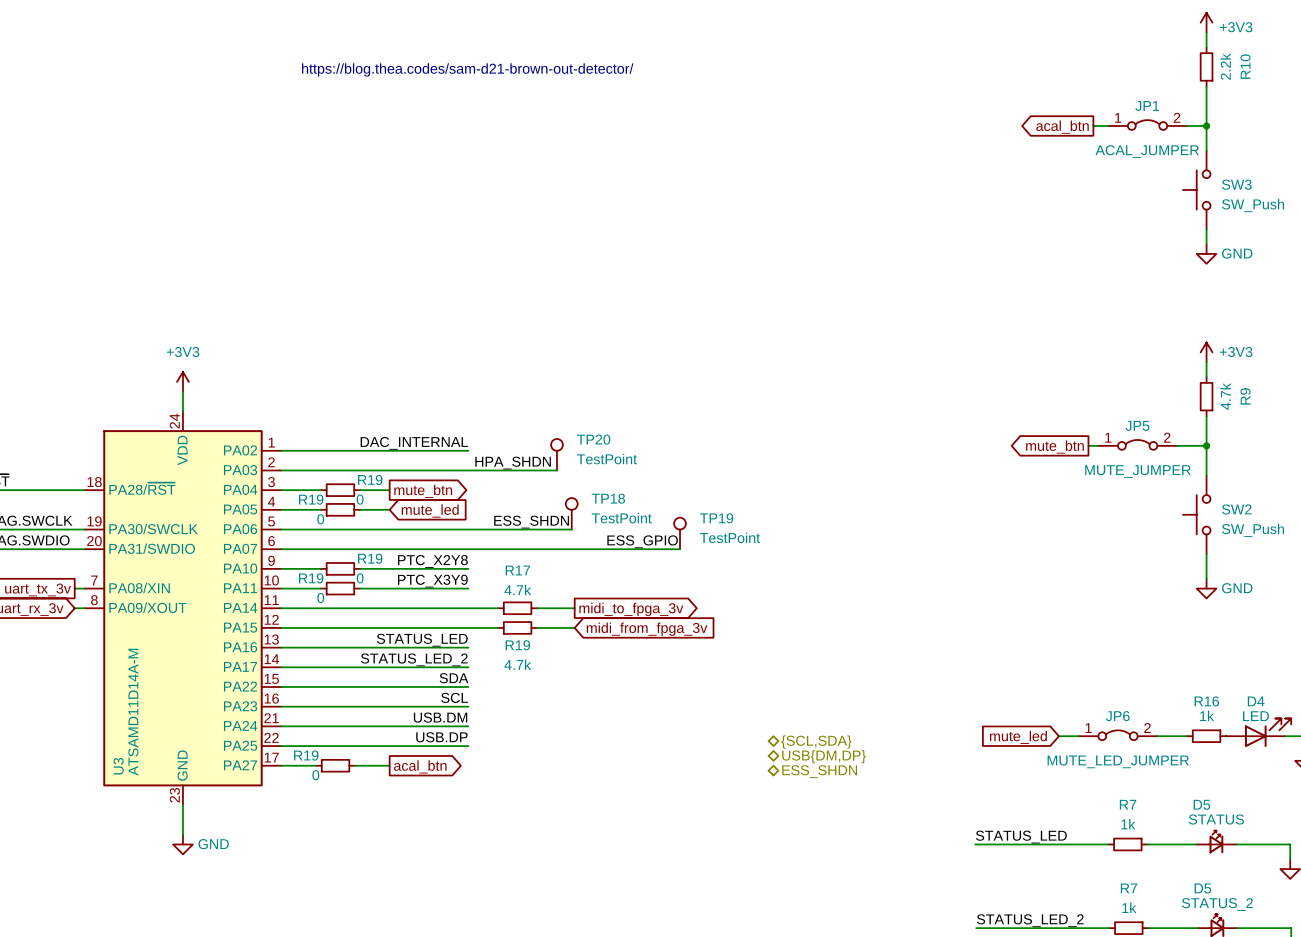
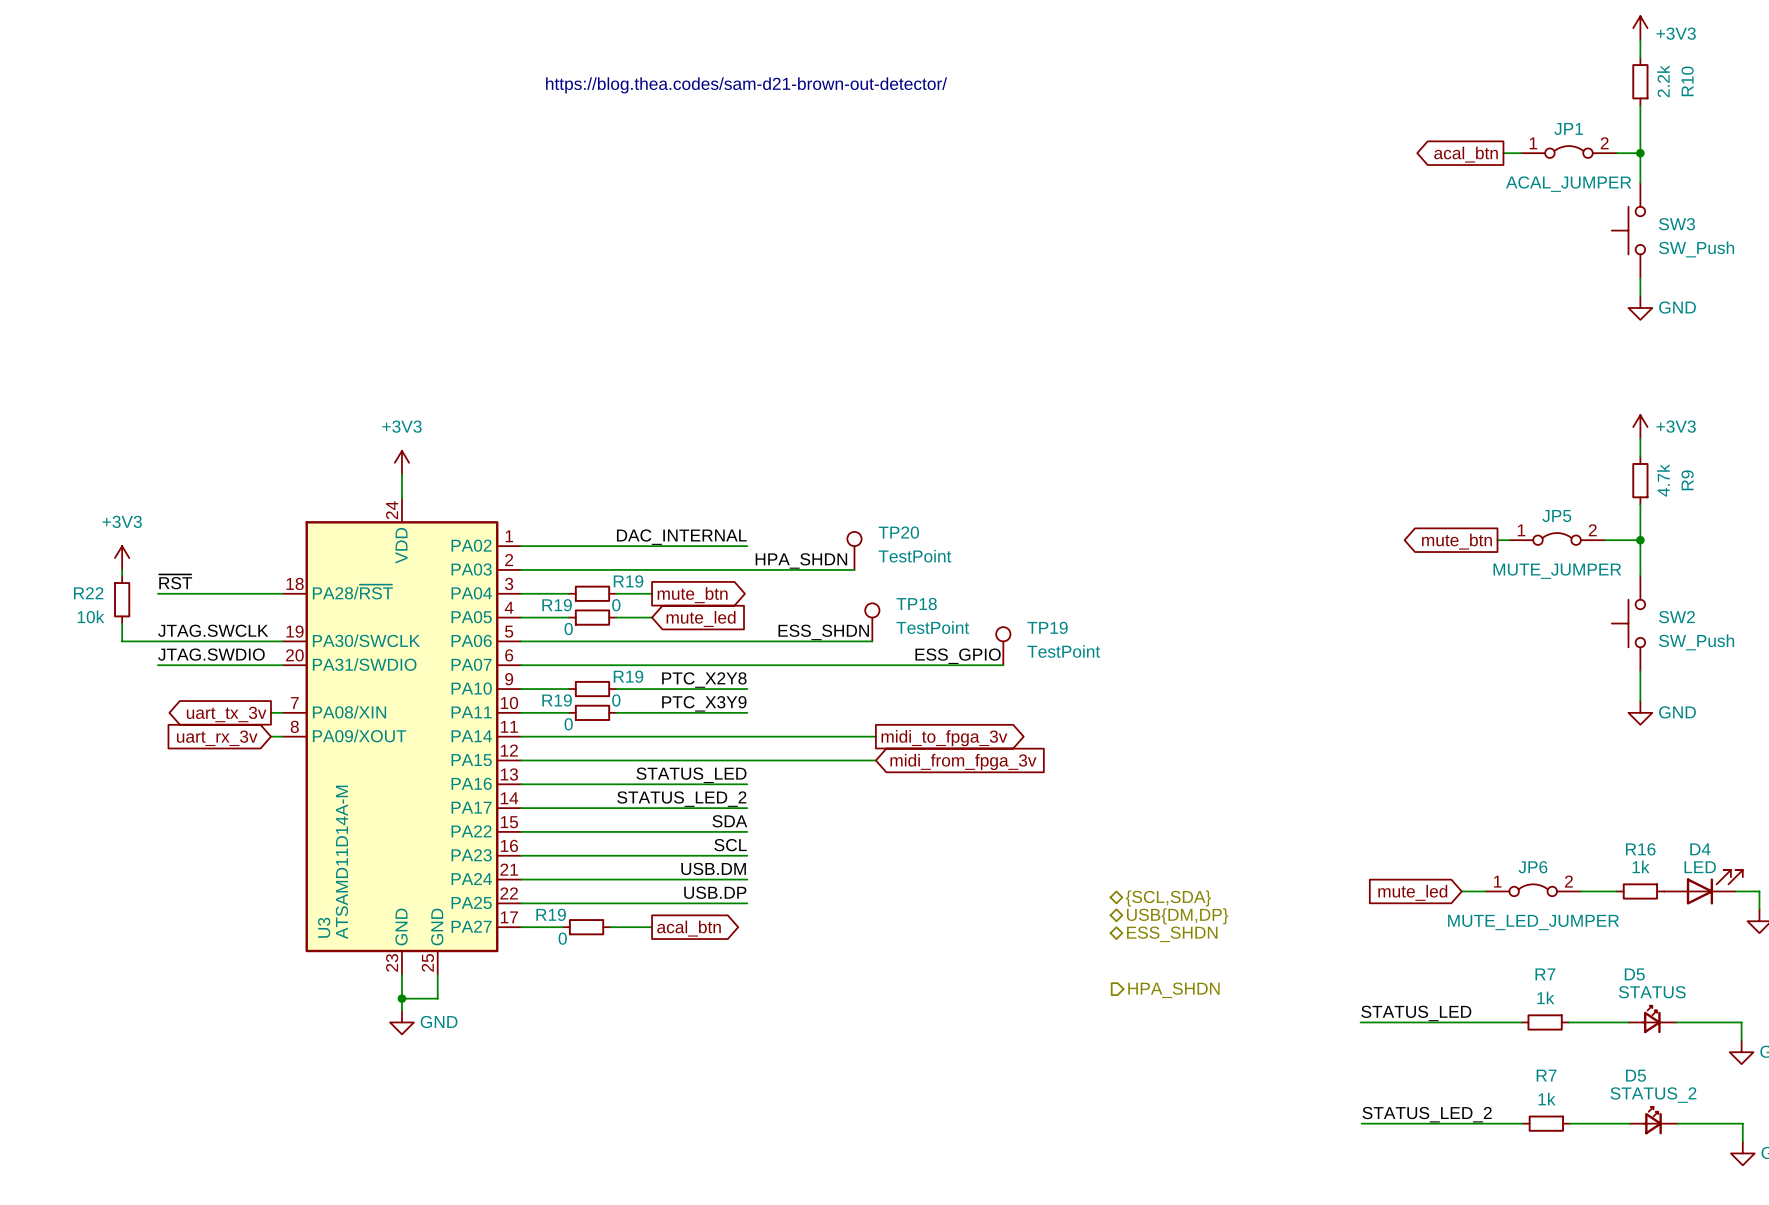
U3 symbol: [84, 411, 282, 806] -> [282, 498, 522, 975]
wire: none -> (783, 736) (830, 736)
R17: 4.7k (517, 608) -> none
wire: none -> (783, 760) (830, 760)
R19: 4.7k (517, 627) -> none
wire: none -> (437, 974) (437, 998) (401, 998)
hierarchical label: none -> HPA_SHDN (1173, 990)
junction: none -> (401, 998)

